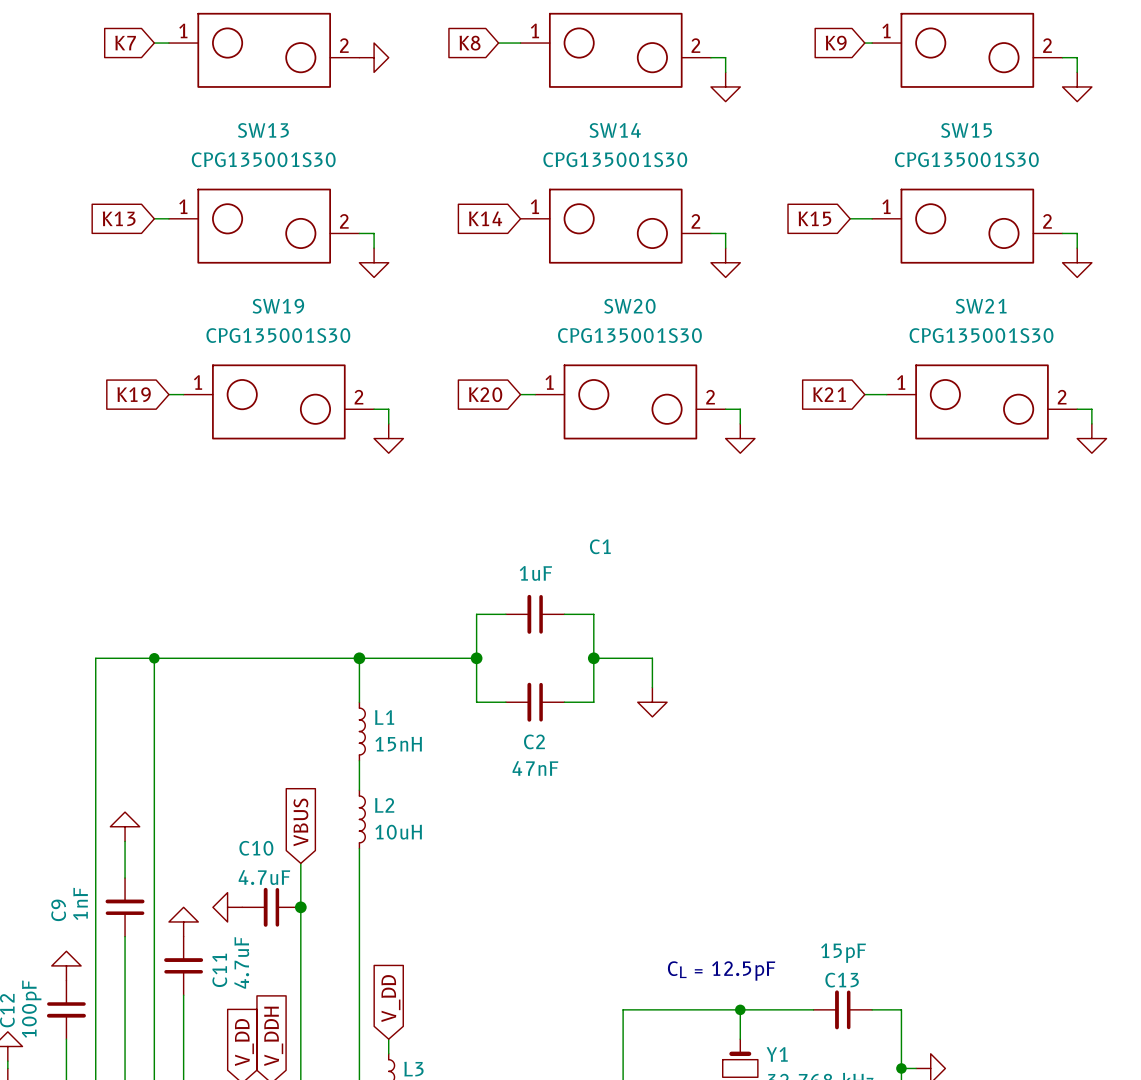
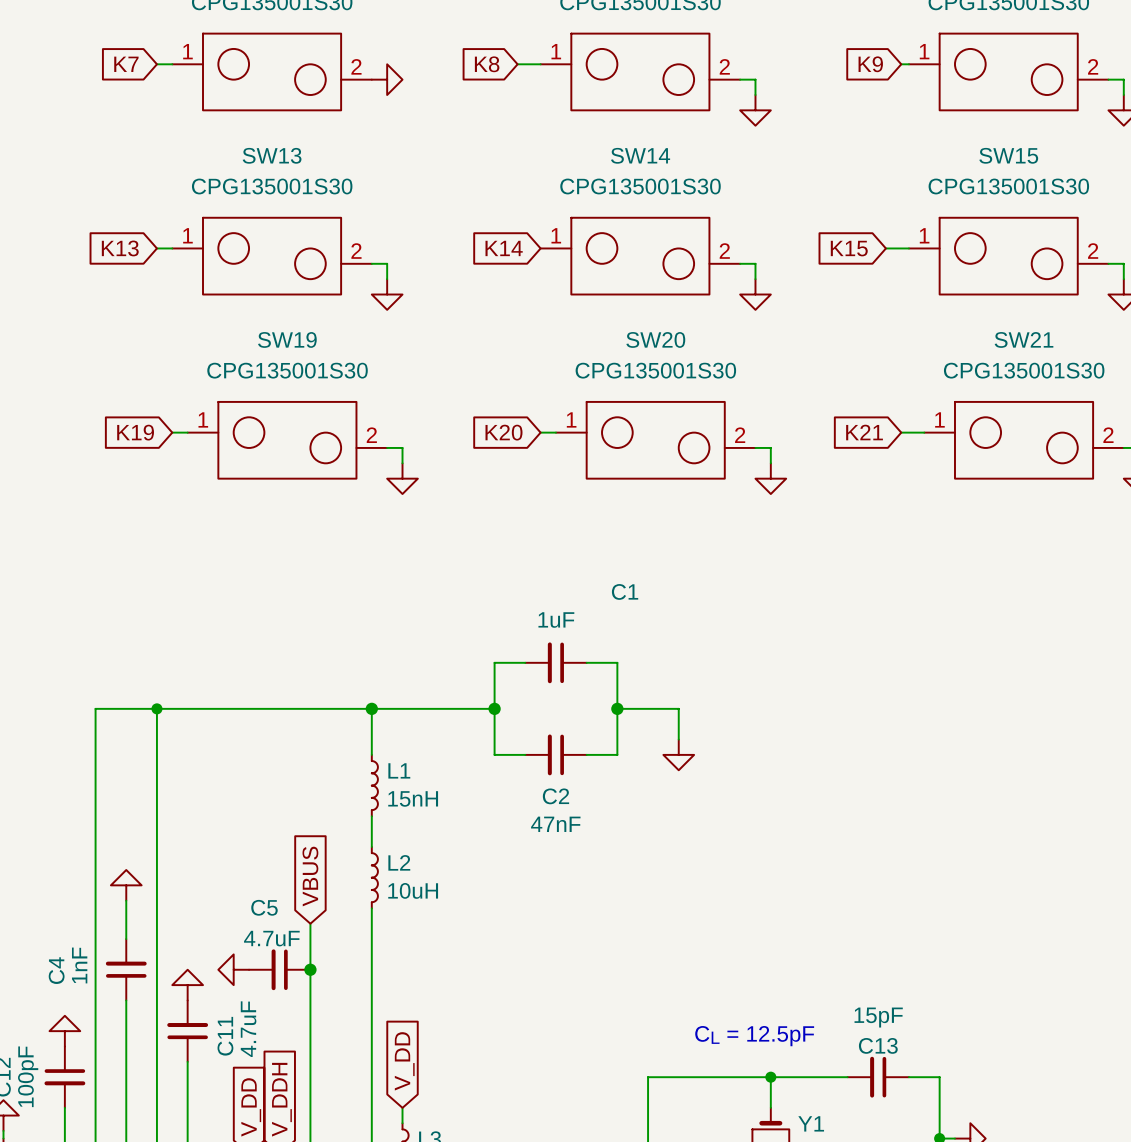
C10 name: C10 (256, 848) -> C5 (264, 907)
C9 name: C9 (58, 910) -> C4 (56, 970)

